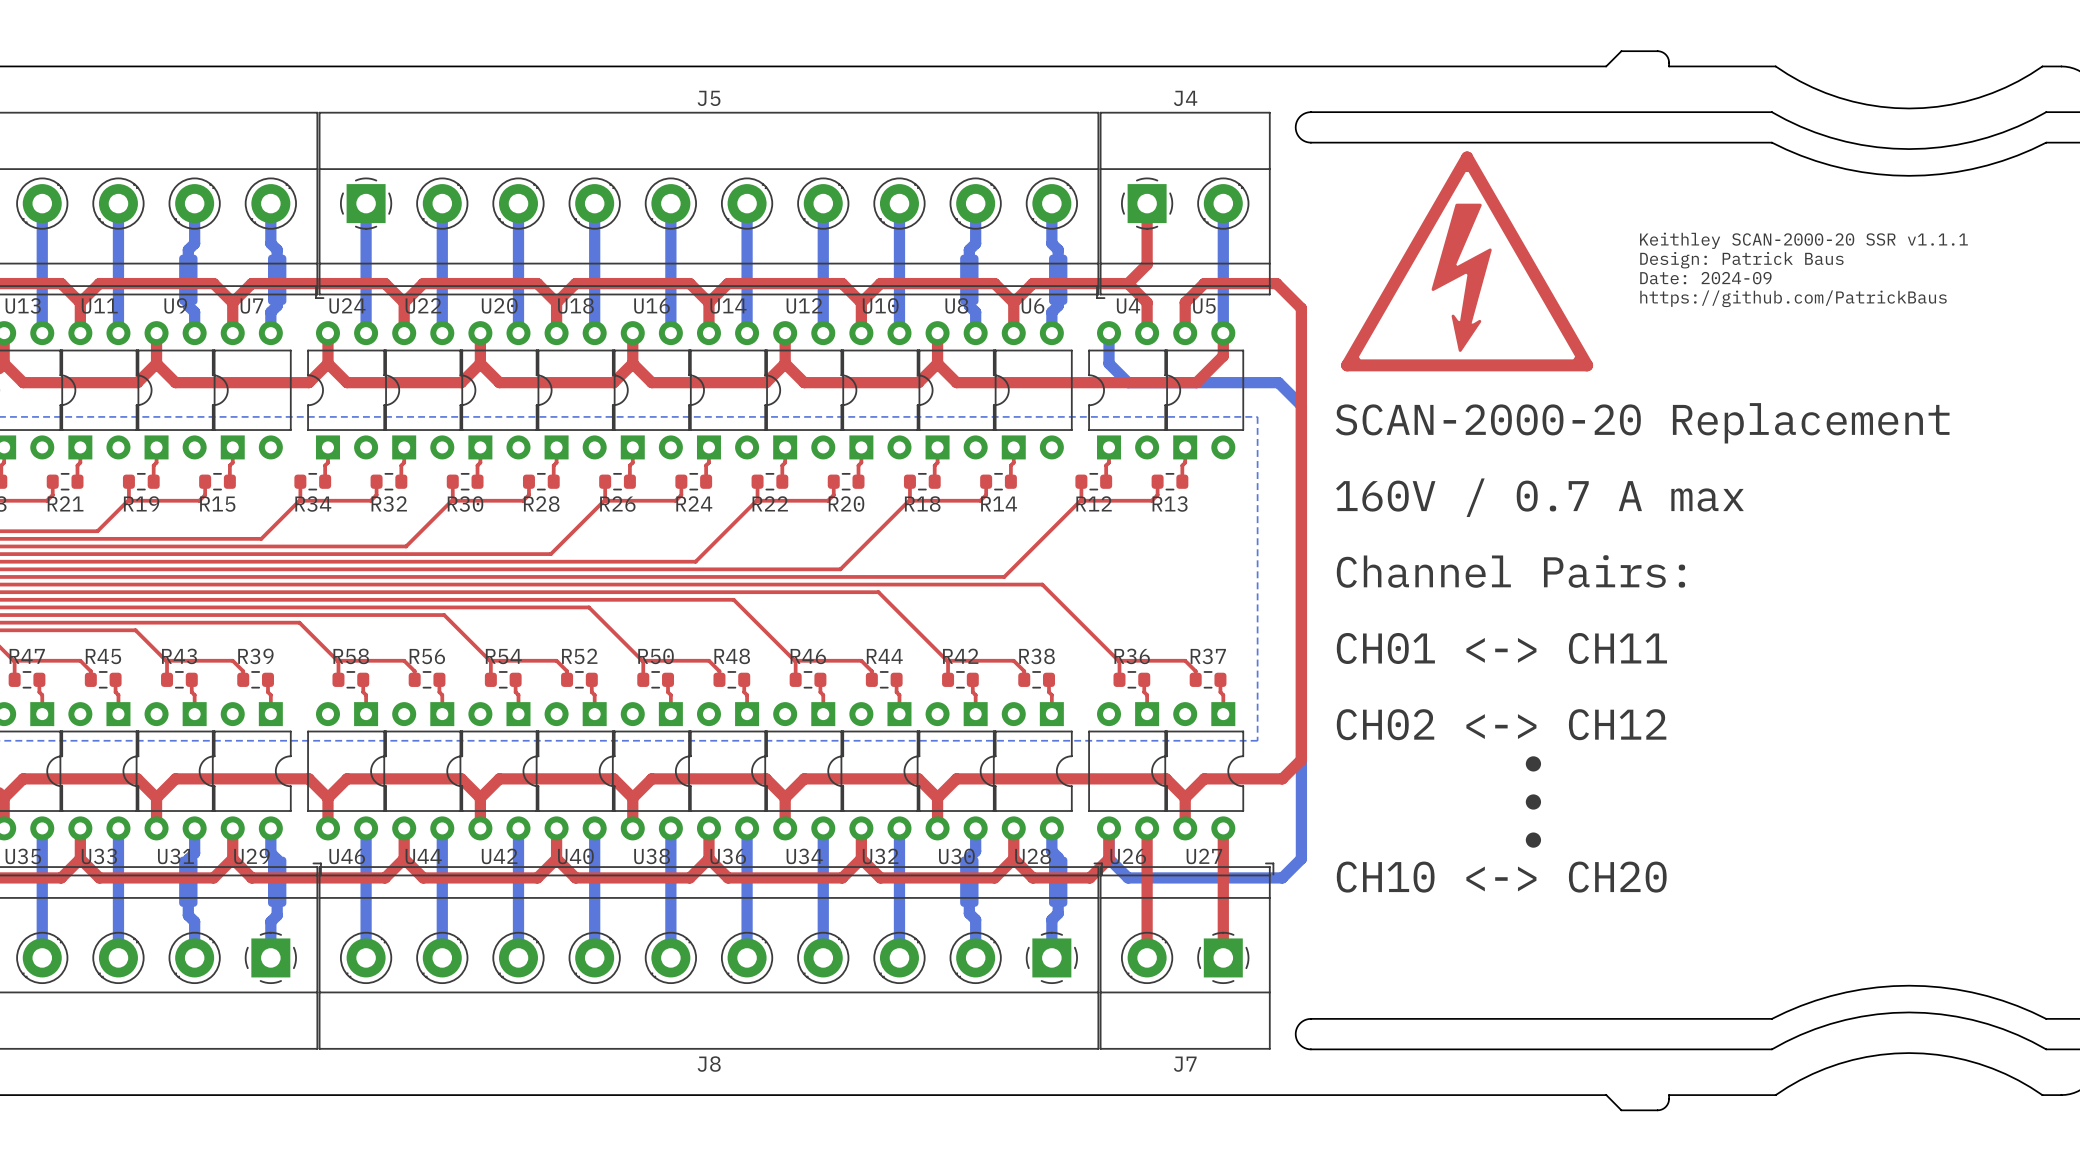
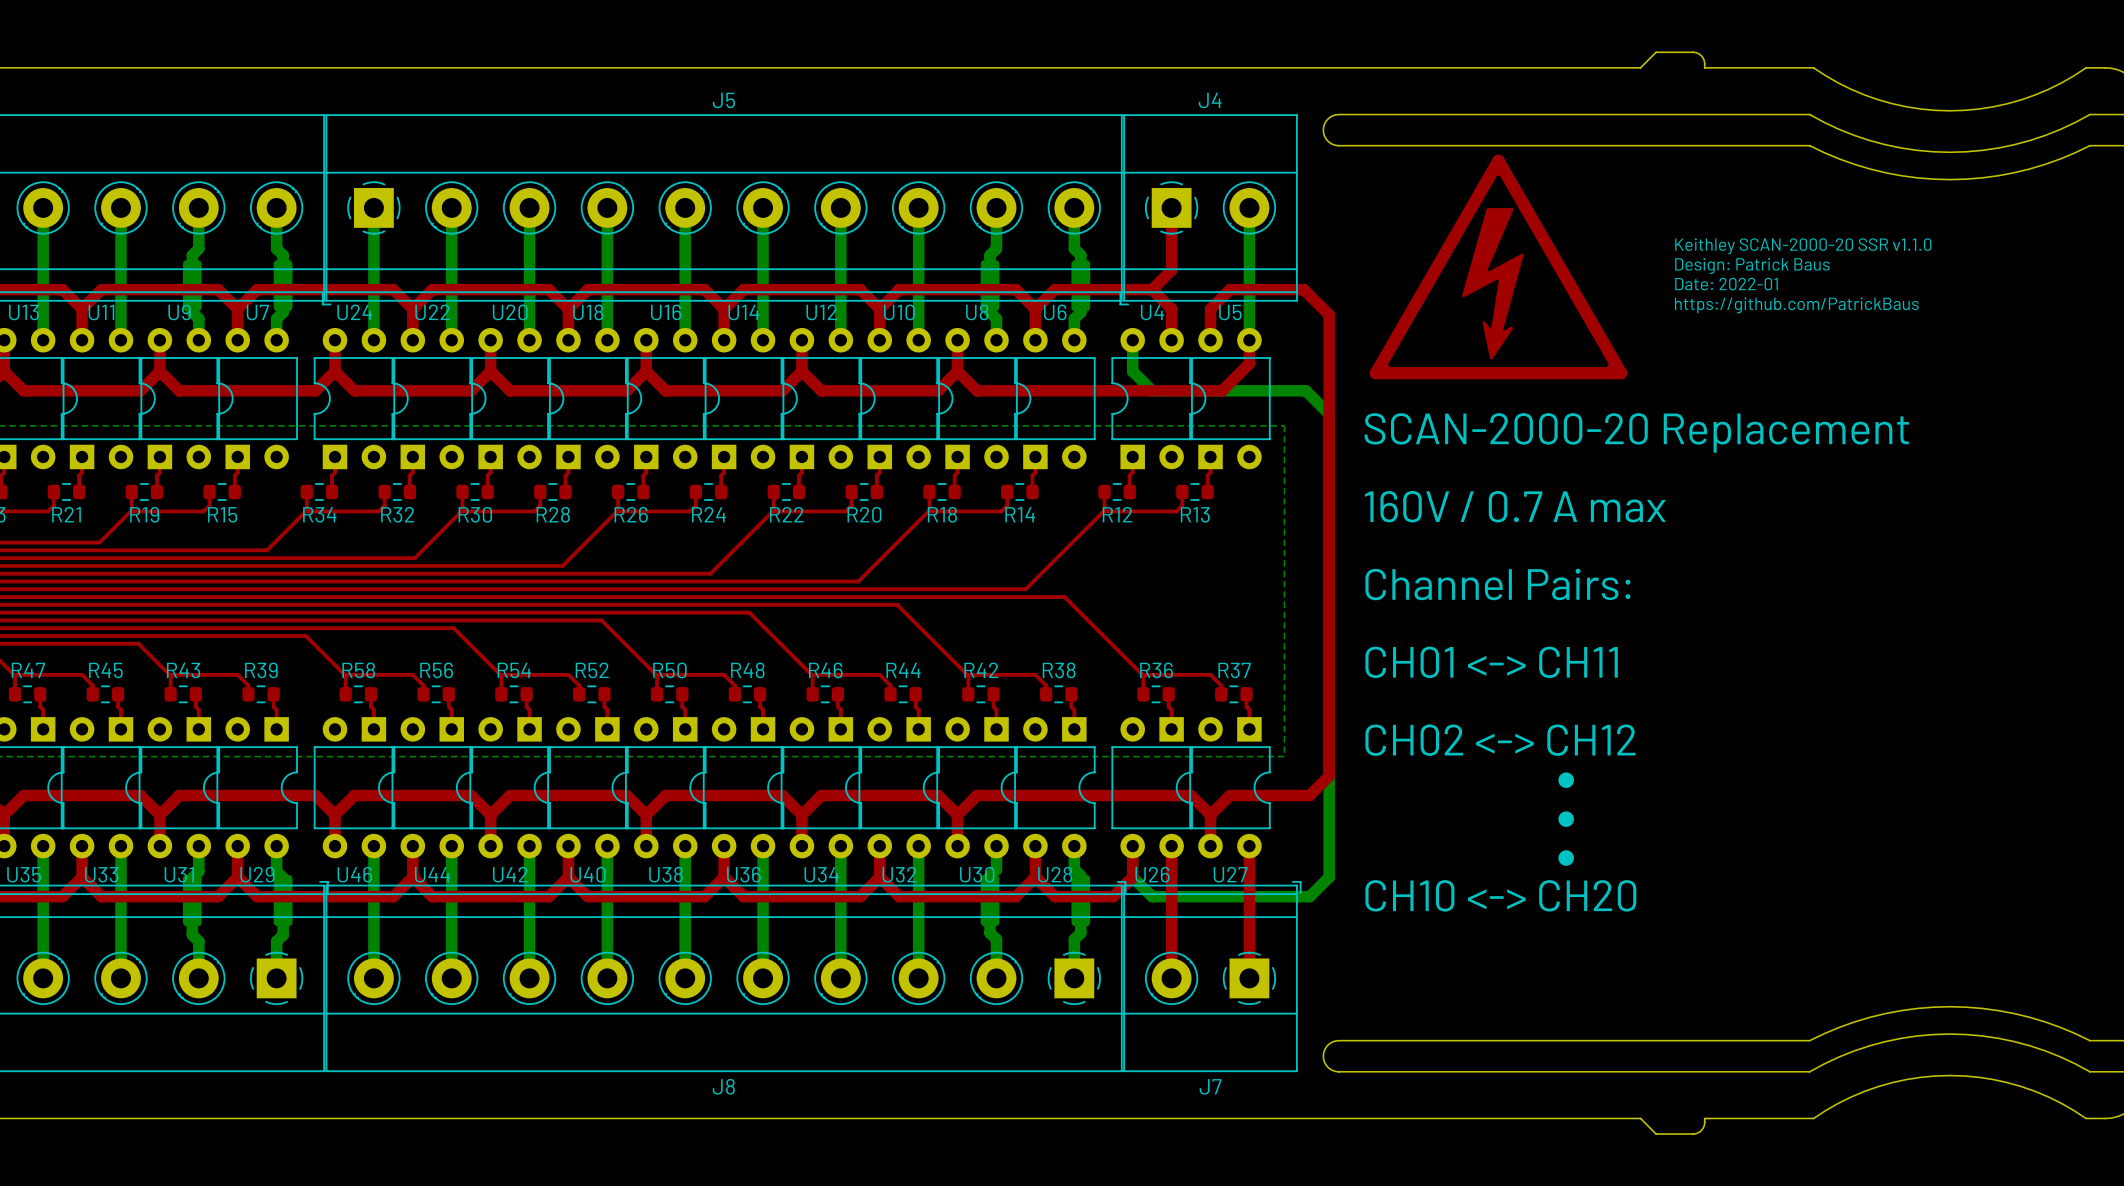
text: Keithley SCAN-2000-20 SSR v1.1.1 (1803, 240) -> Keithley SCAN-2000-20 SSR v1.1.0 (1803, 246)
text: Date: 2024-09 (1705, 278) -> Date: 2022-01 (1726, 284)

